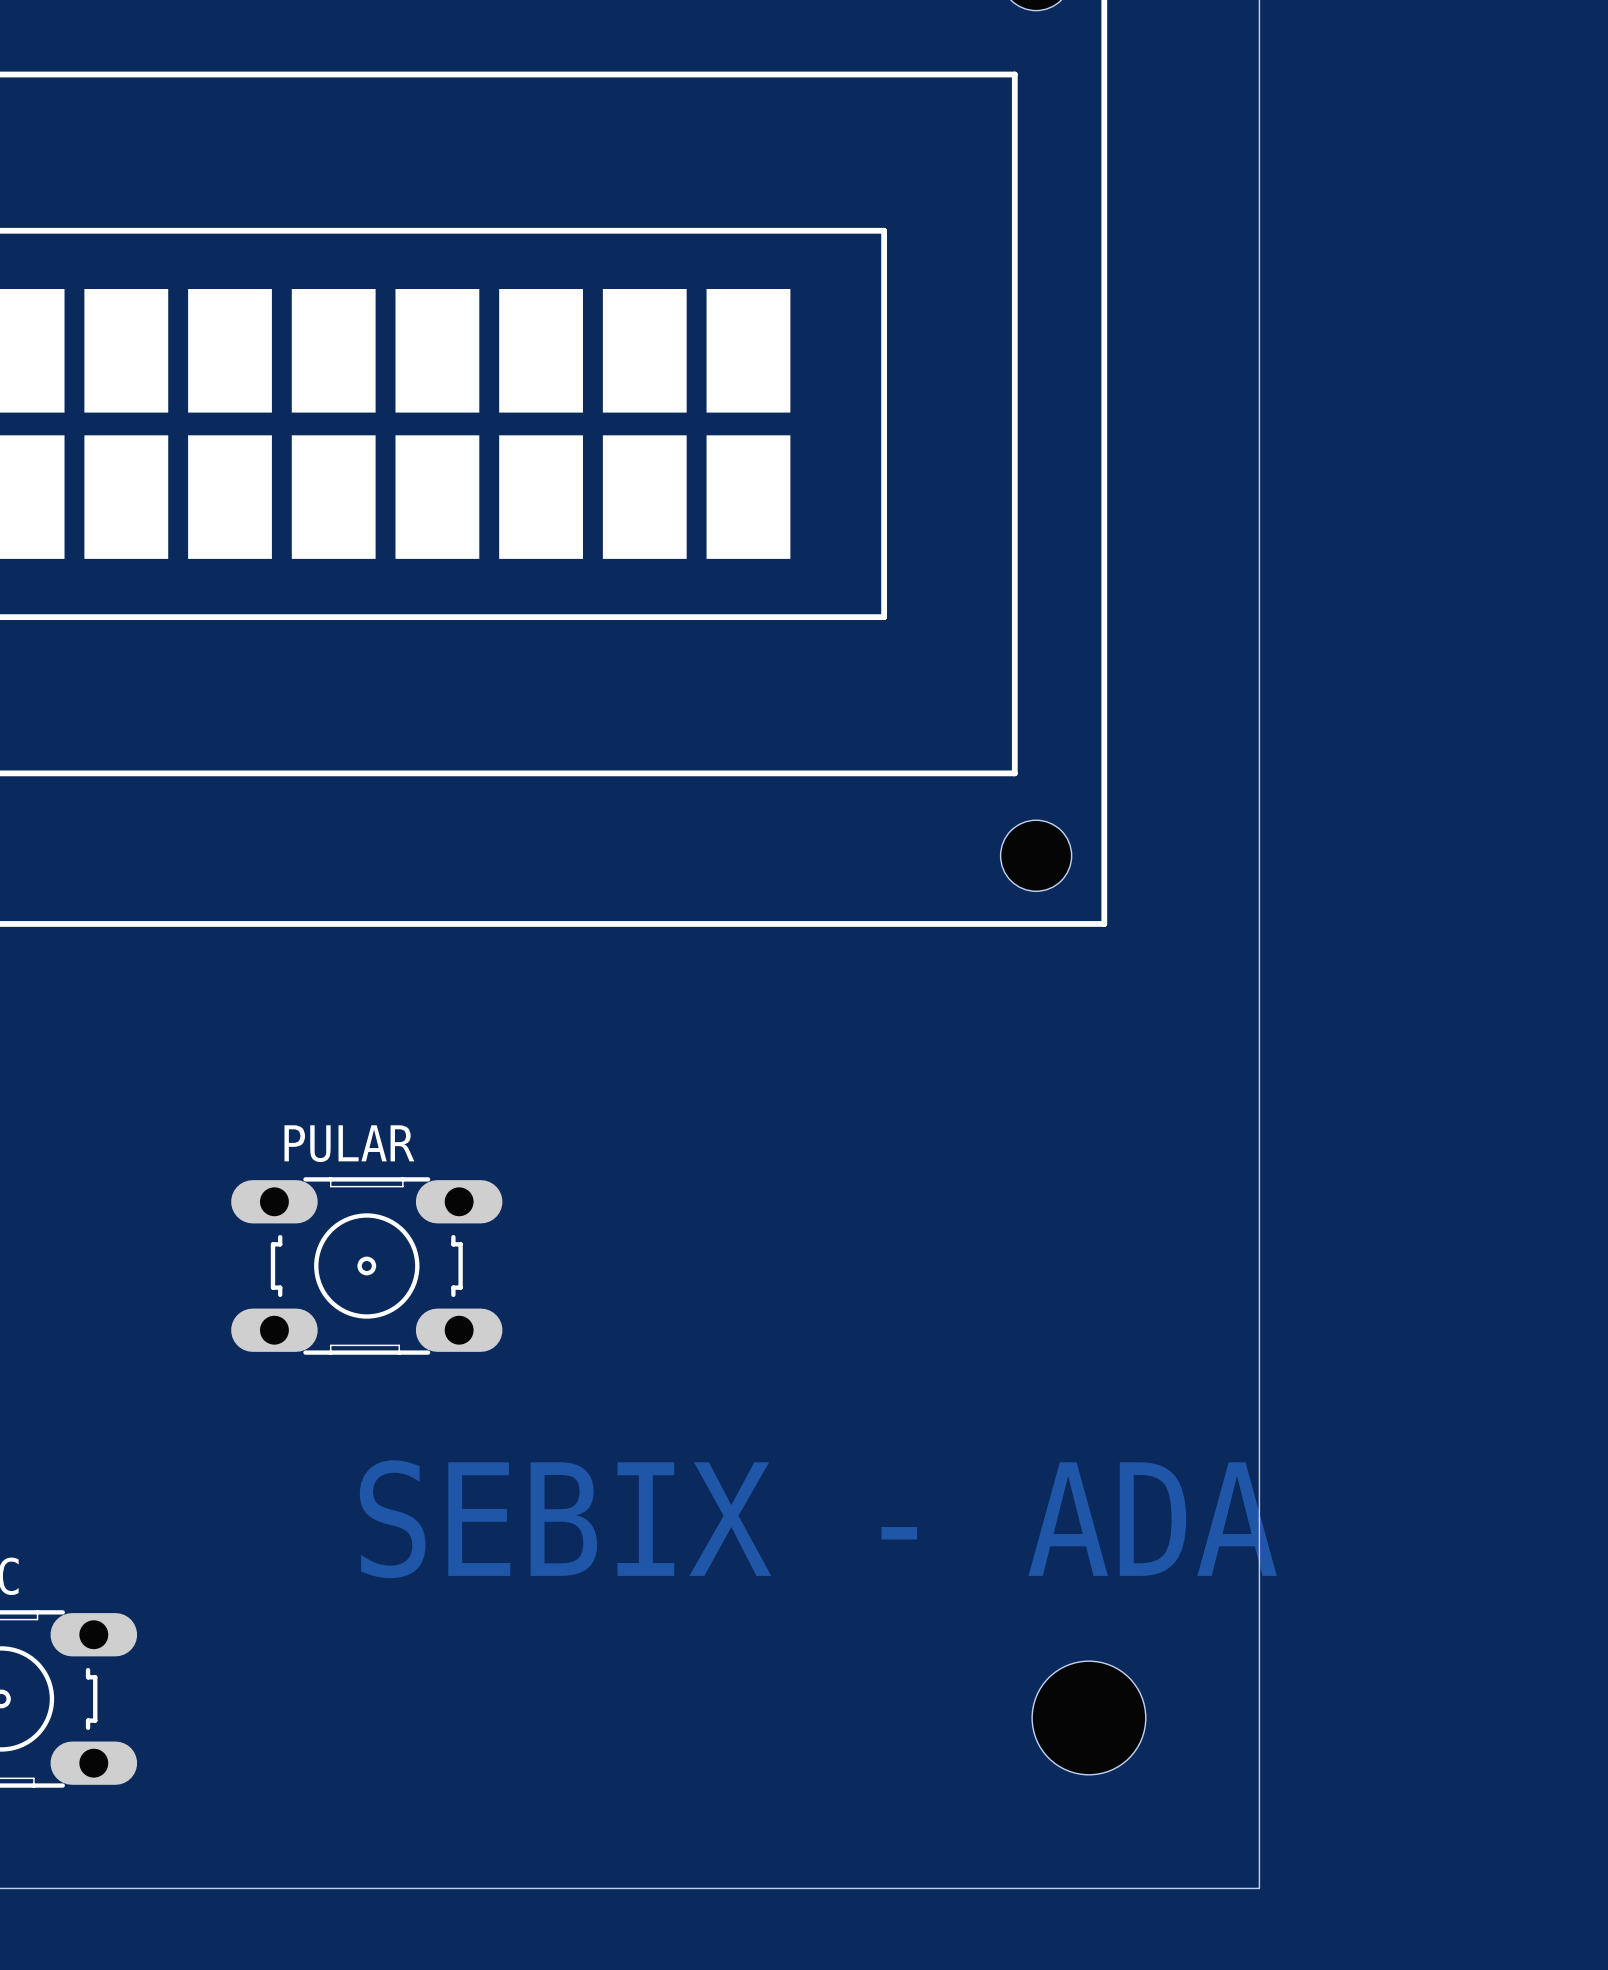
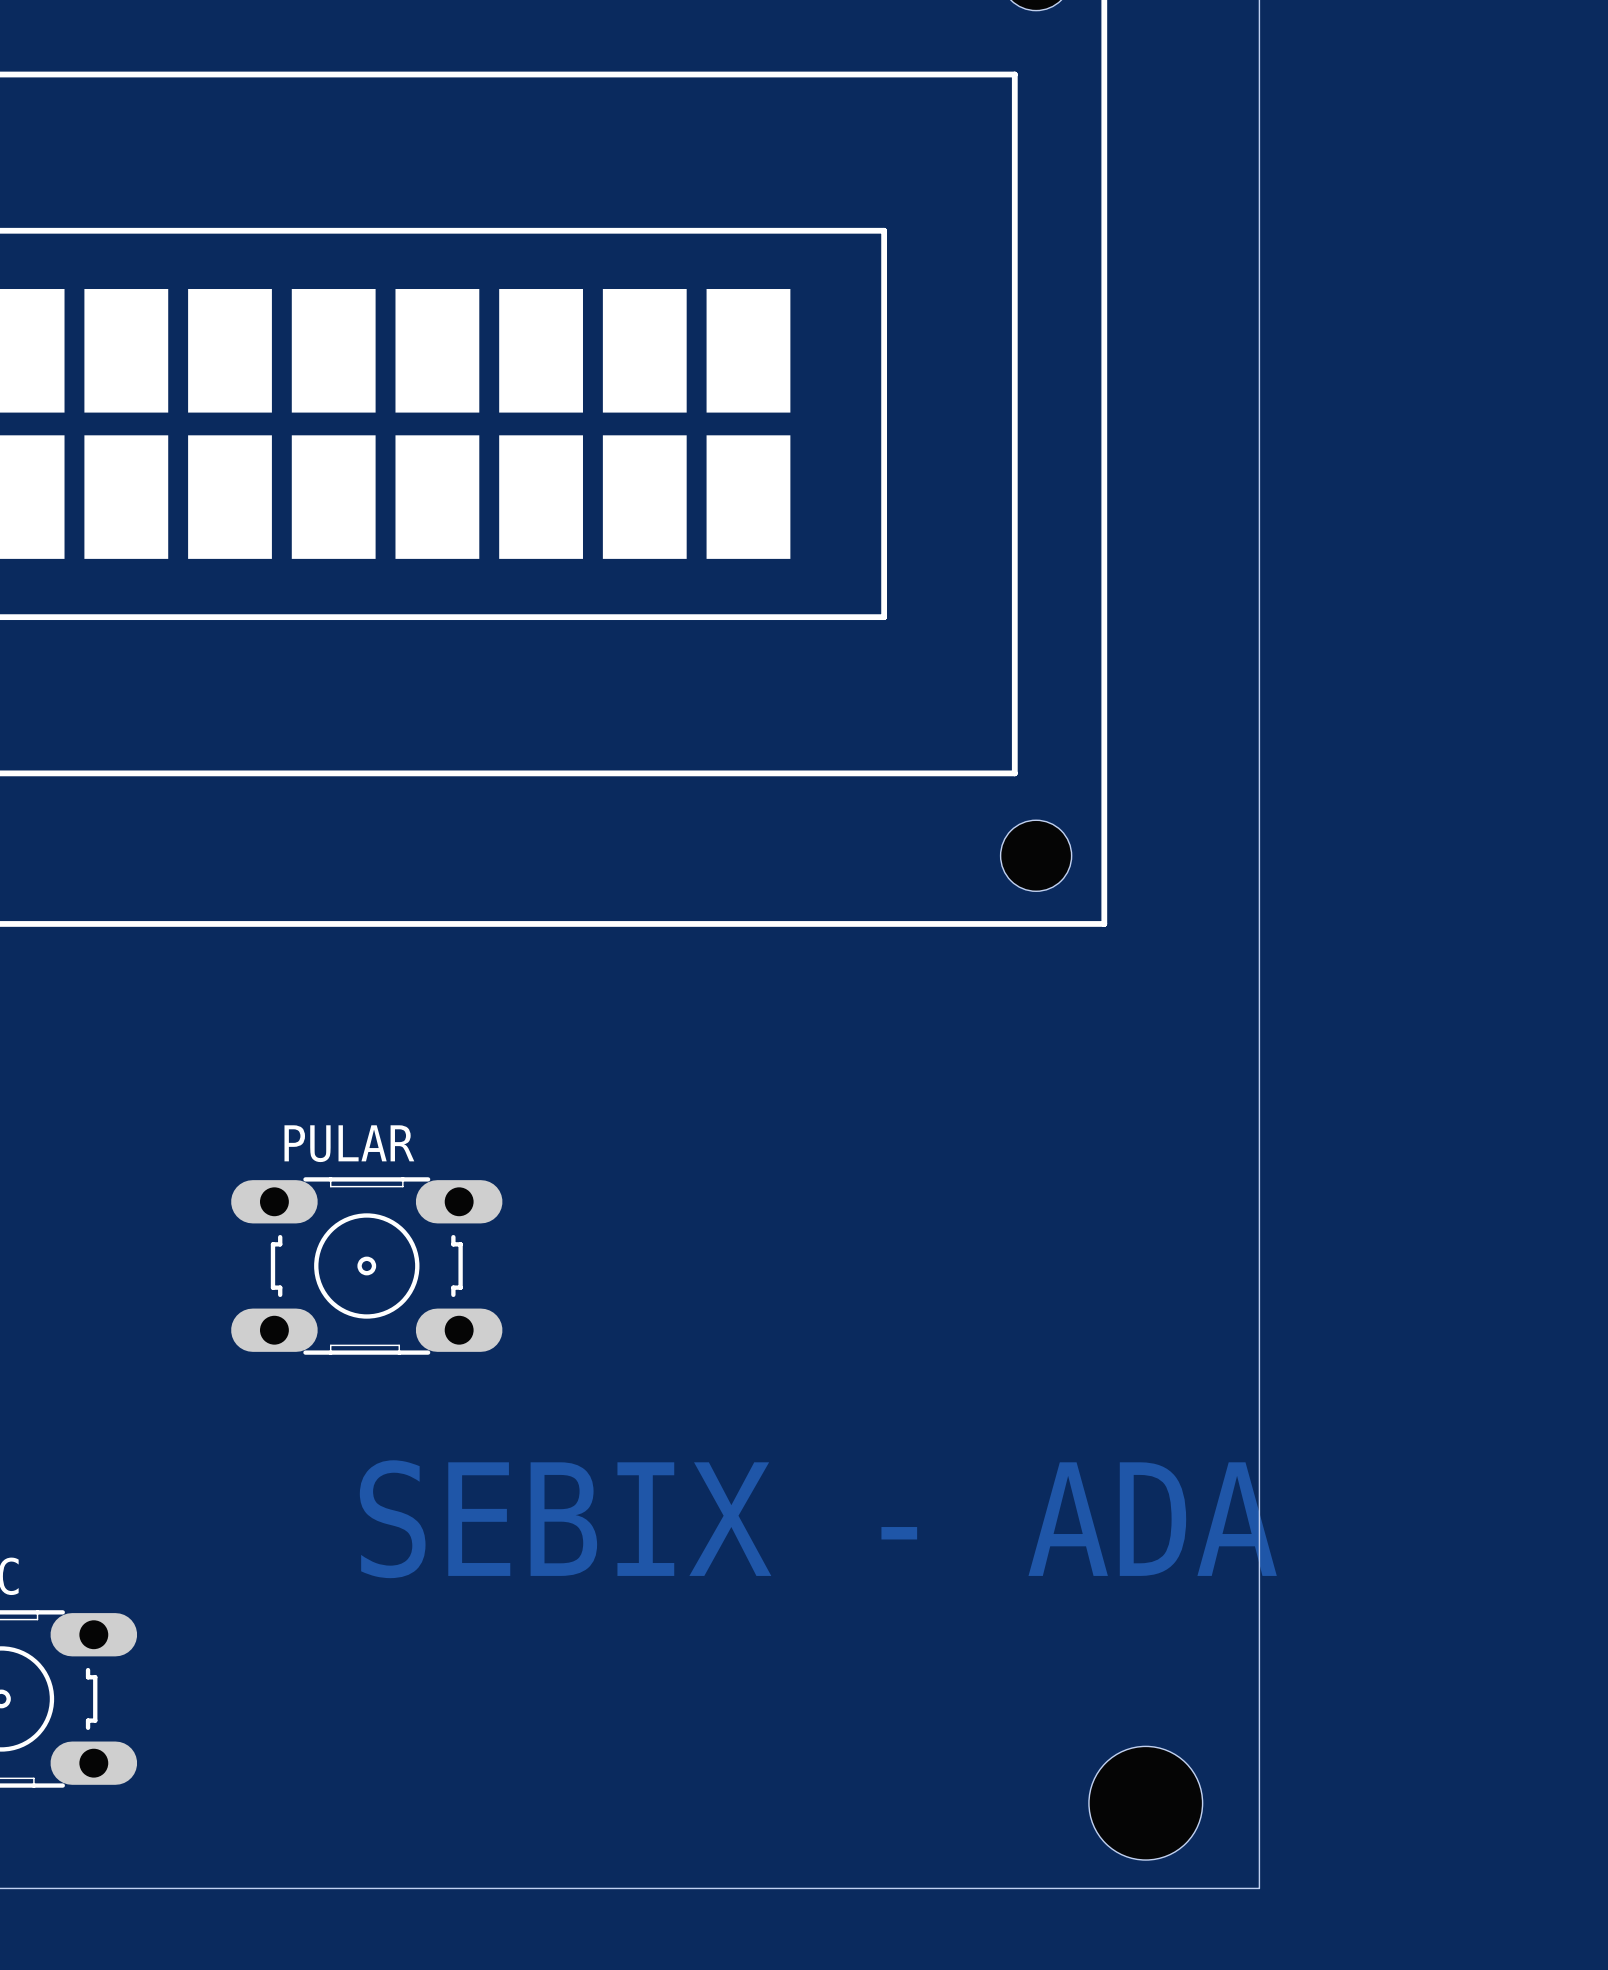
hole position: (1088, 1717) -> (1145, 1803)

